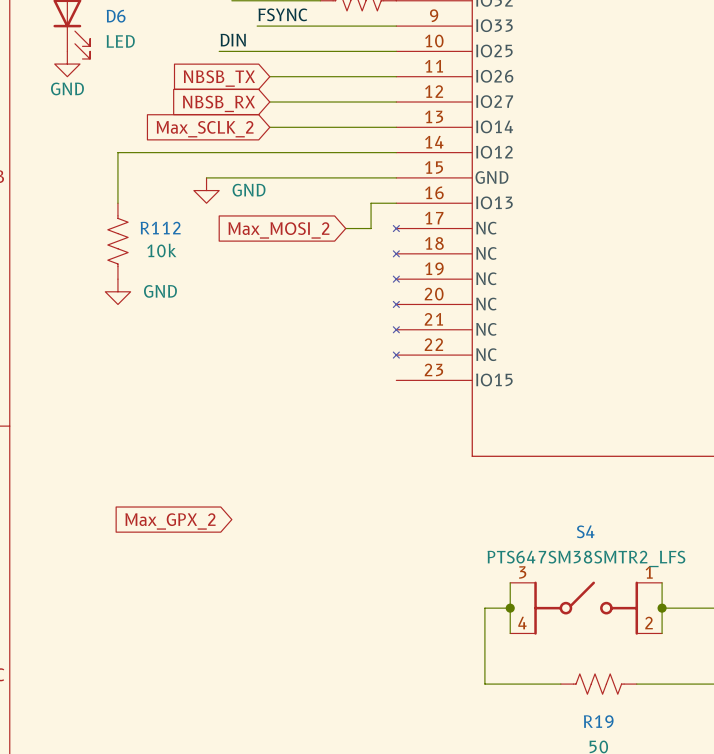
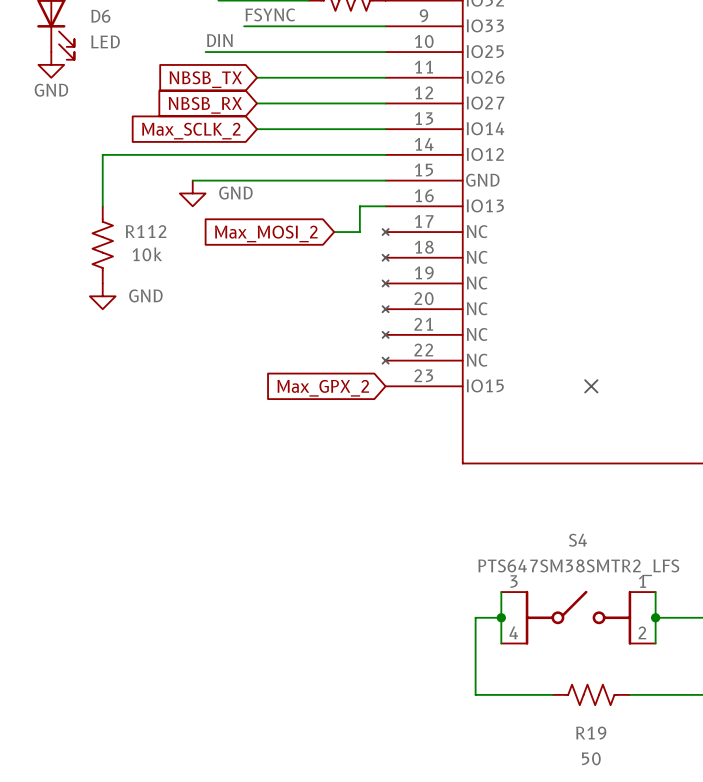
no-connect mark: none -> (591, 386)
global label position: Max_GPX_2 (170, 521) -> Max_GPX_2 (323, 388)

